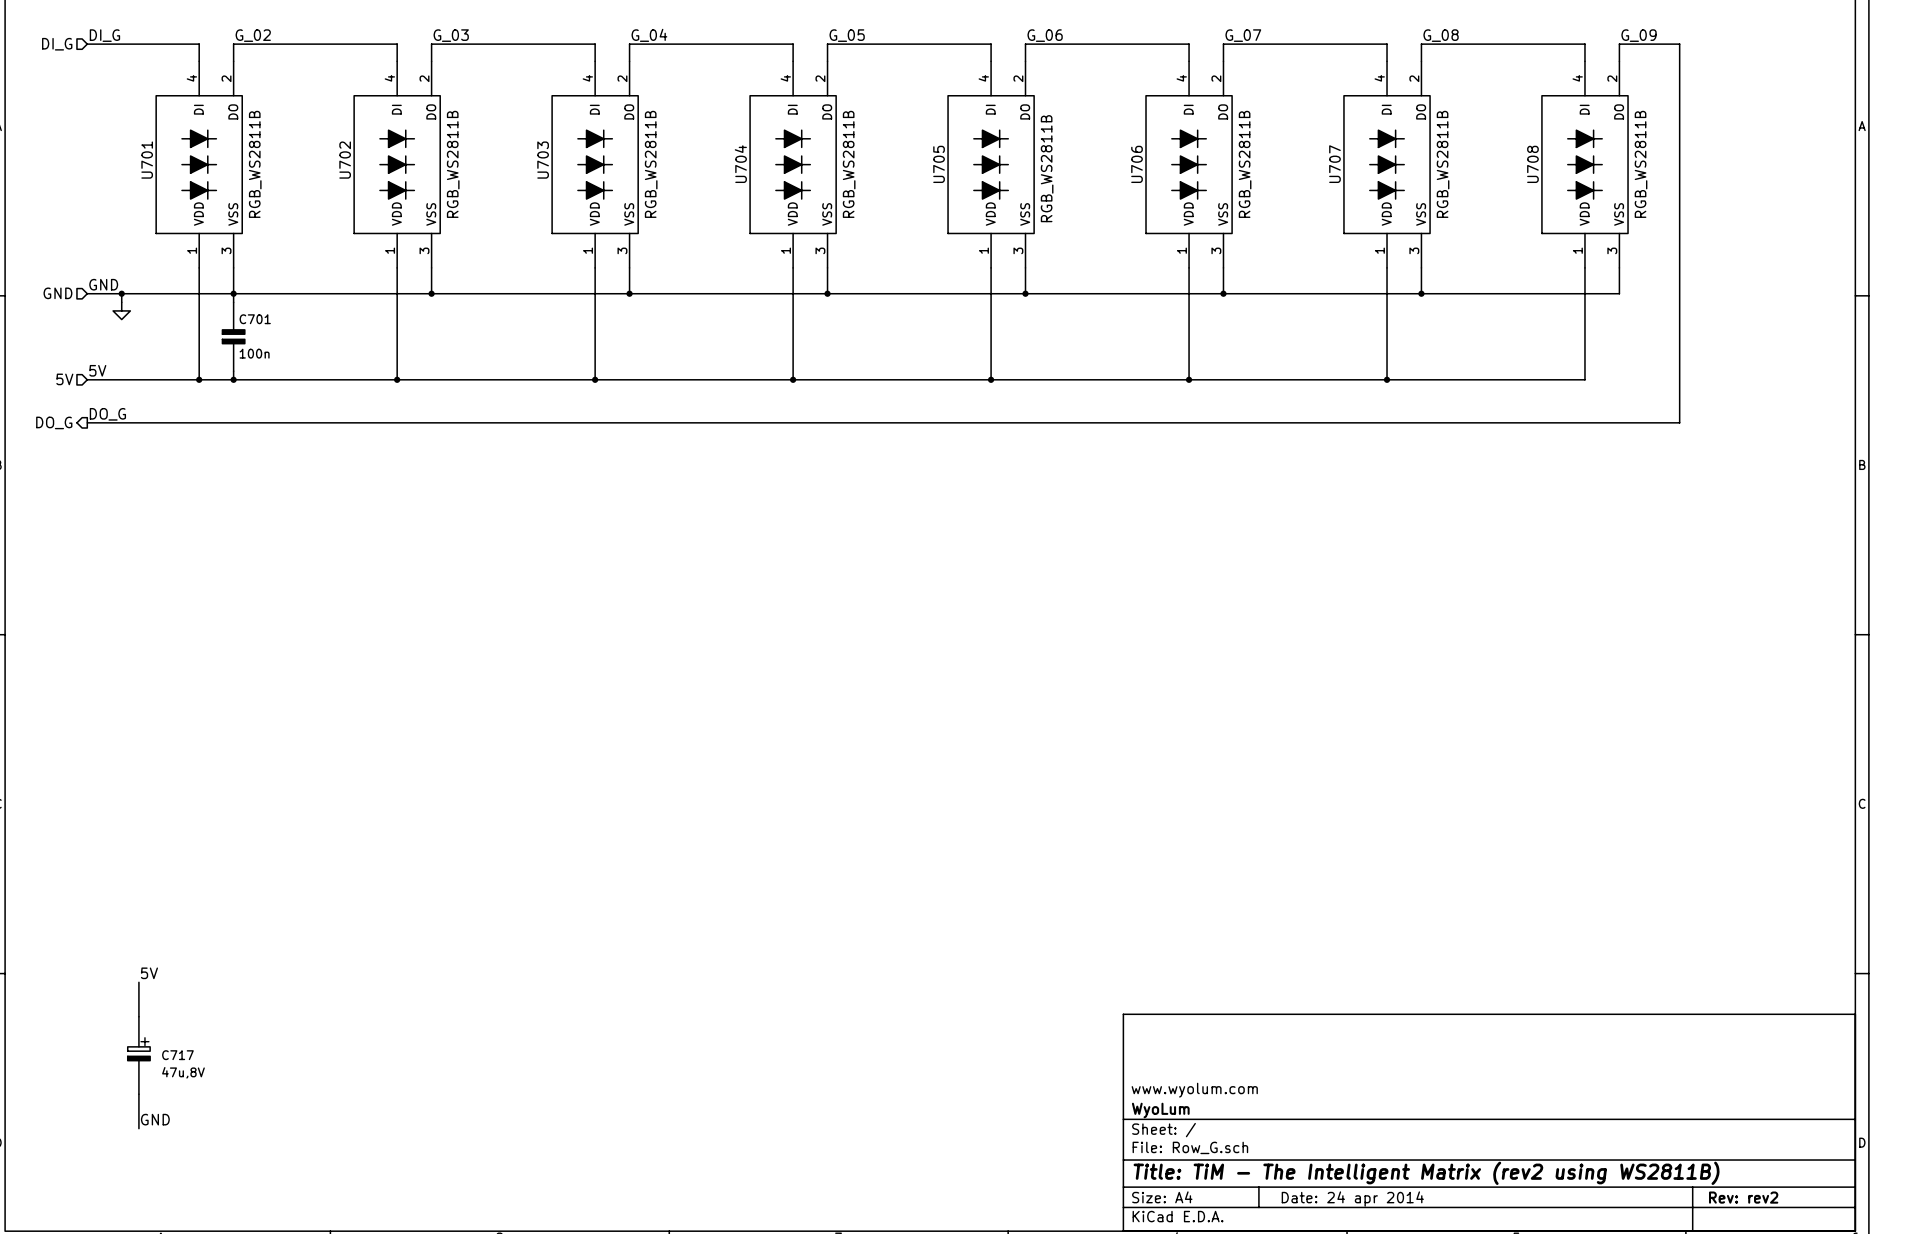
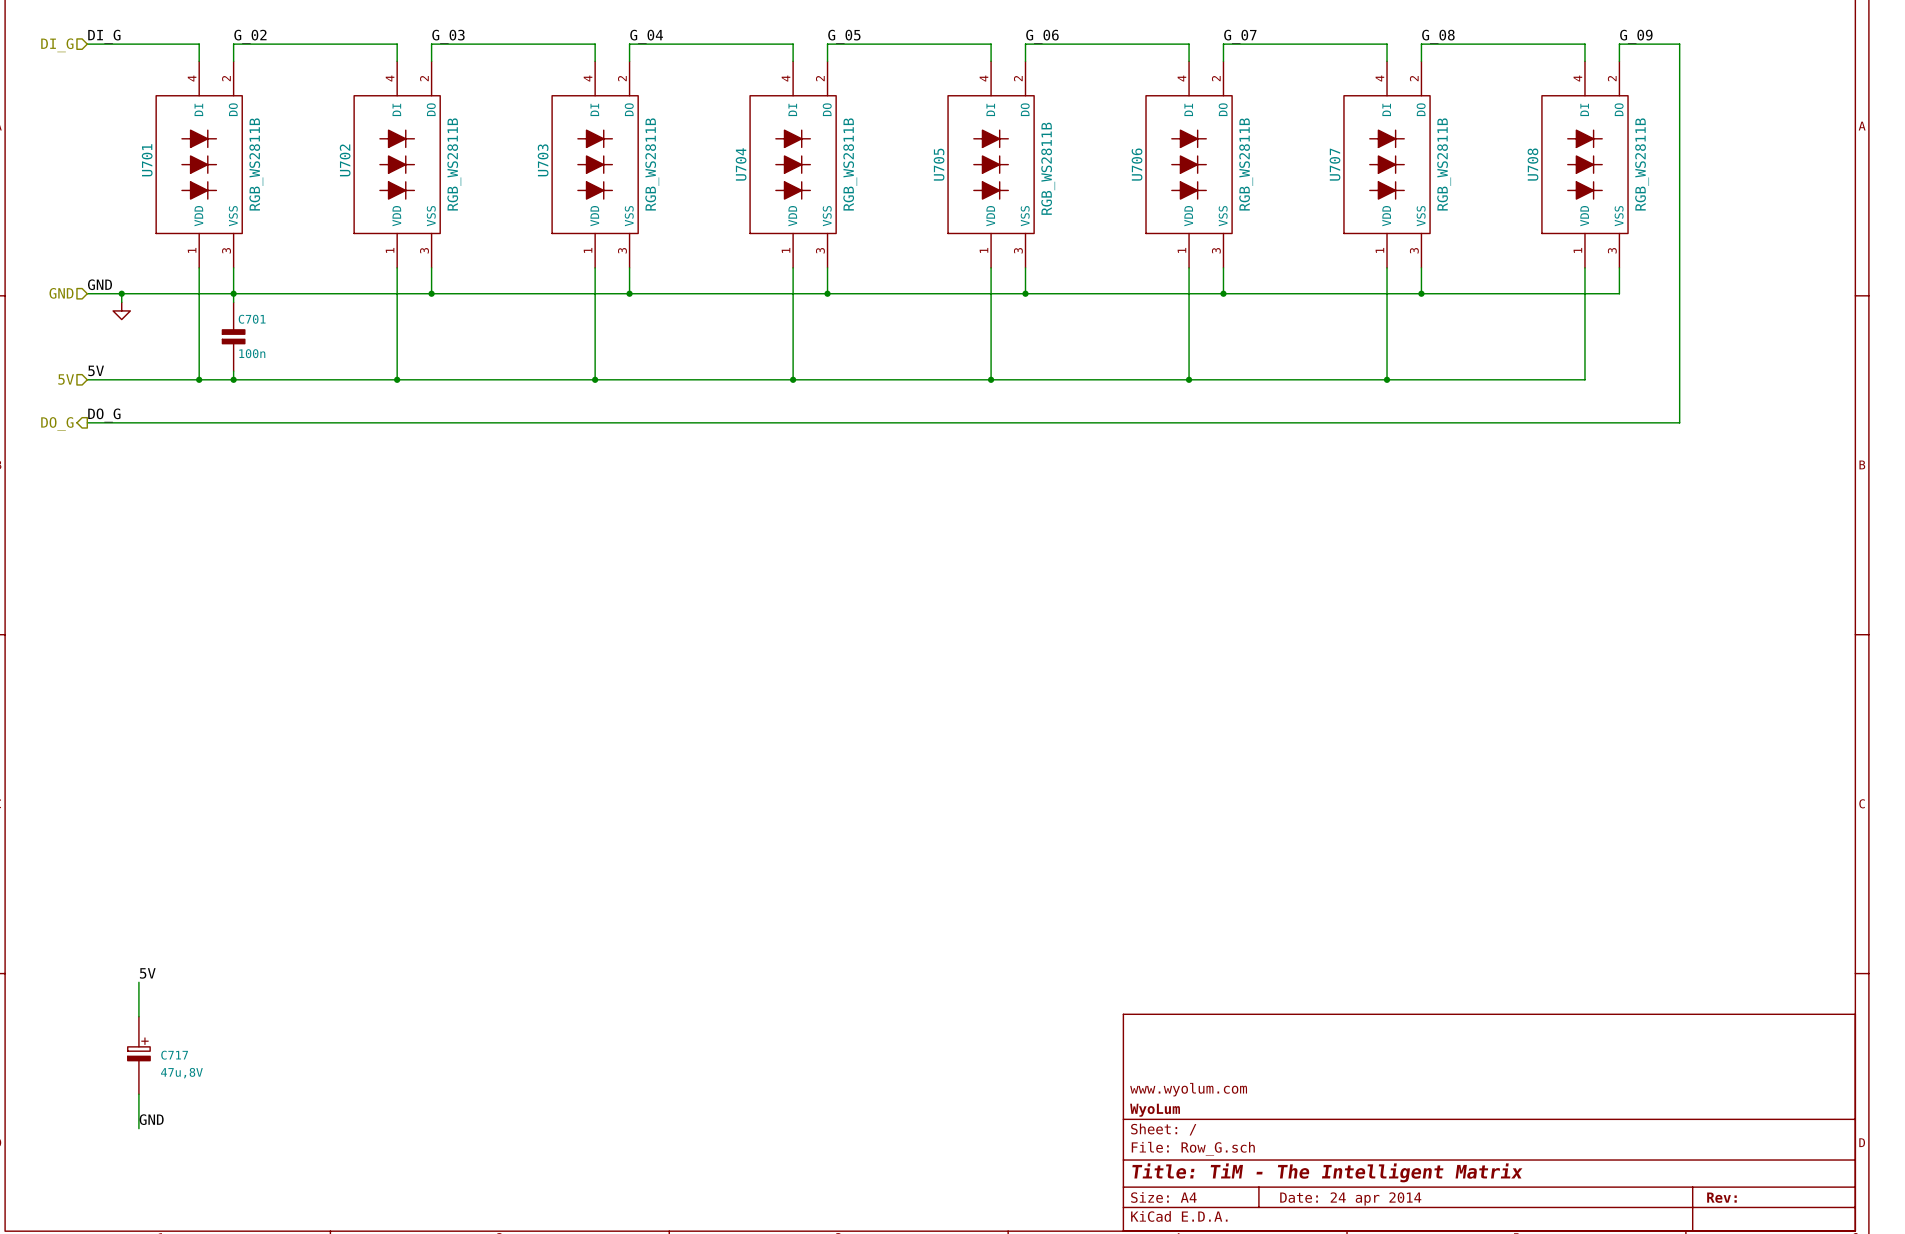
title block: Title: TiM - The Intelligent Matrix (rev2 using WS2811B) (1426, 1173) -> Title: TiM - The Intelligent Matrix (1327, 1172)
title block: Rev: rev2 (1743, 1197) -> Rev: (1721, 1197)

